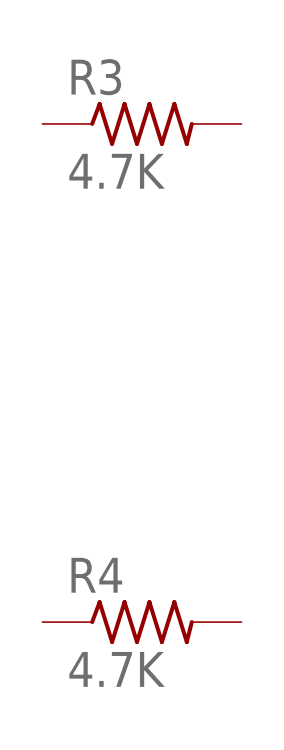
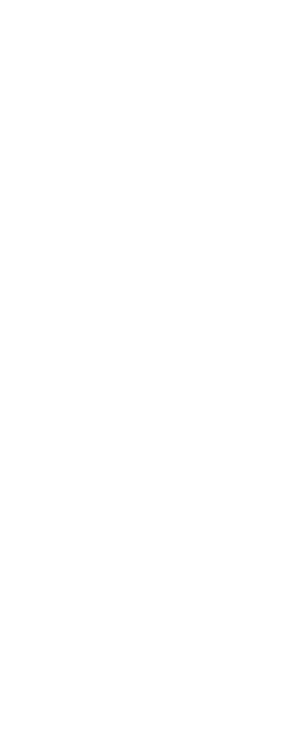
R3: 4.7K (141, 123) -> none
R4: 4.7K (141, 622) -> none

